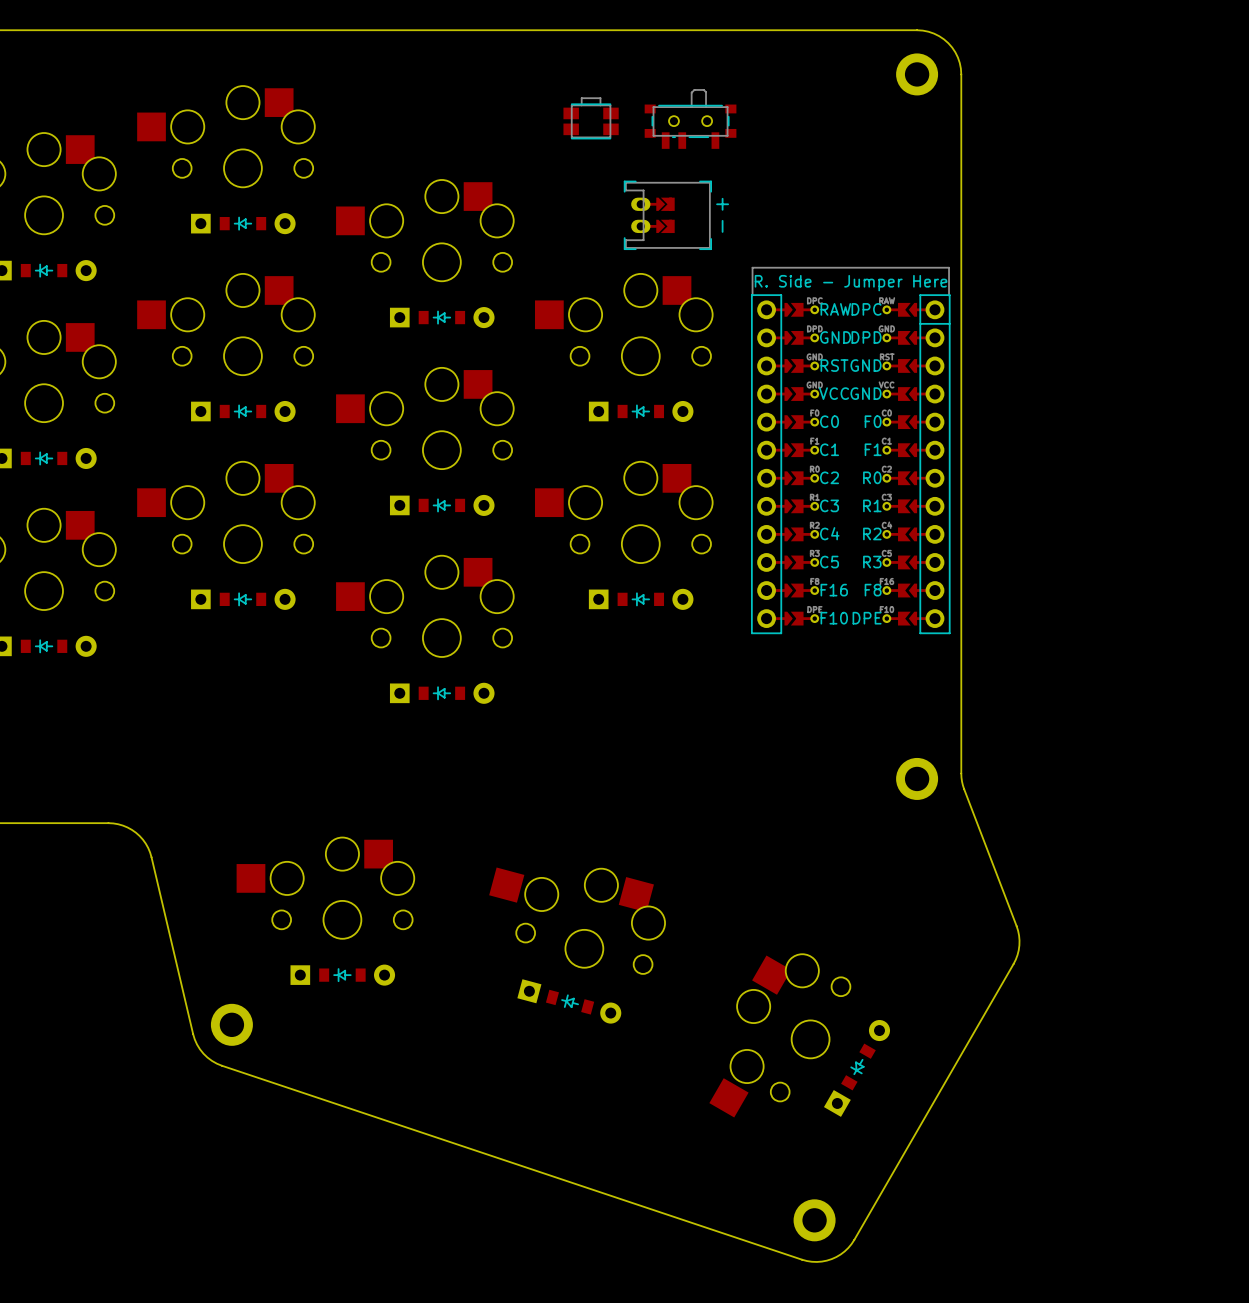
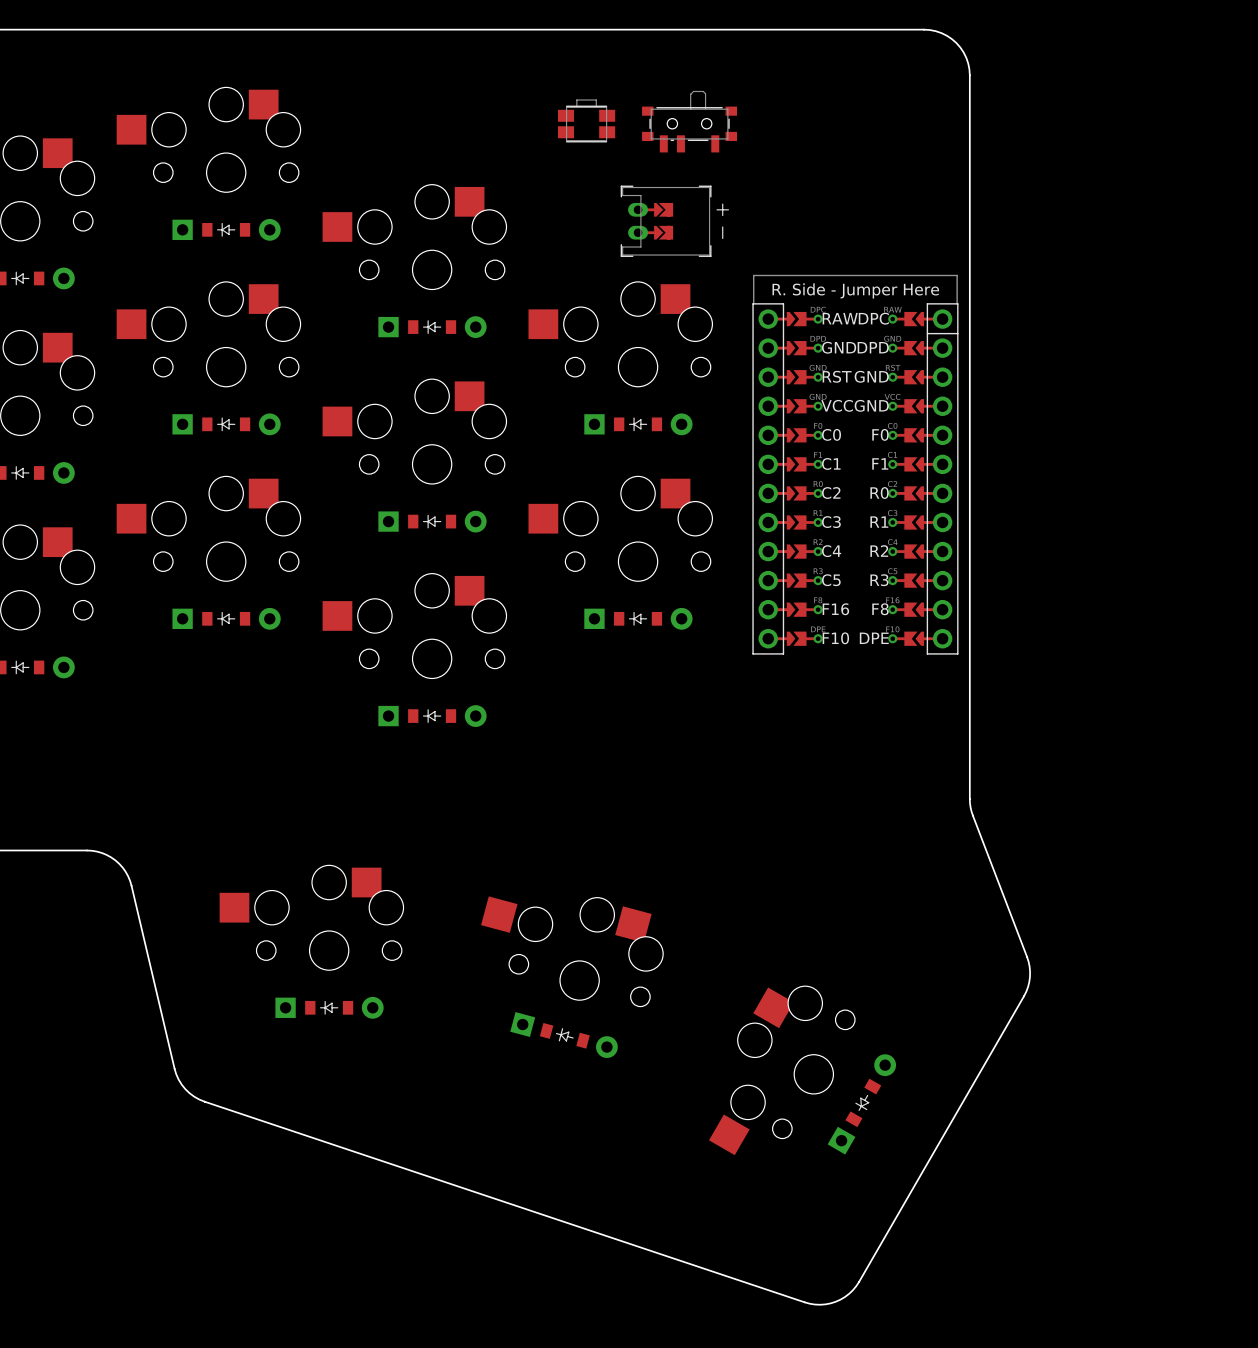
part: (917, 74) -> none
part: (917, 778) -> none
part: (231, 1024) -> none
part: (814, 1220) -> none

